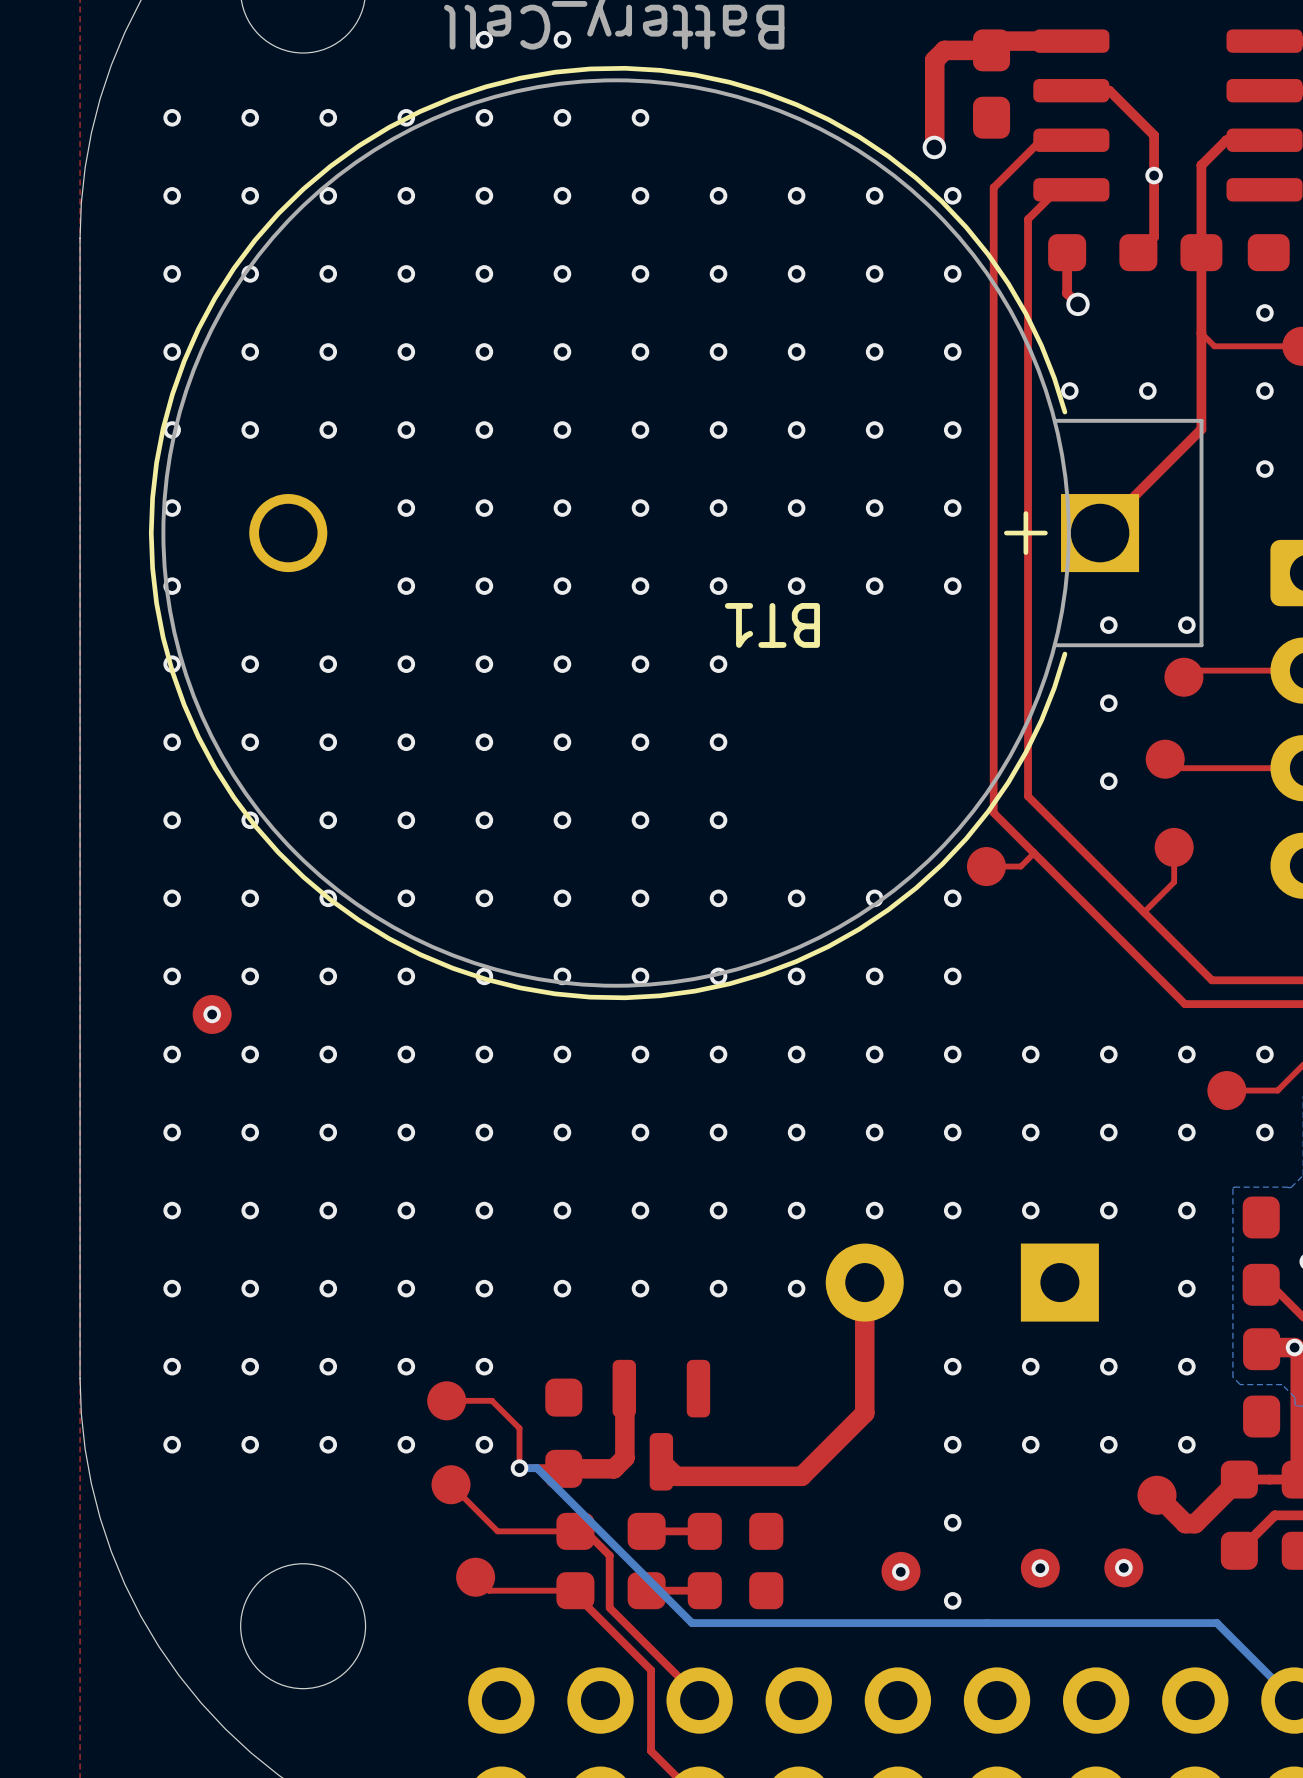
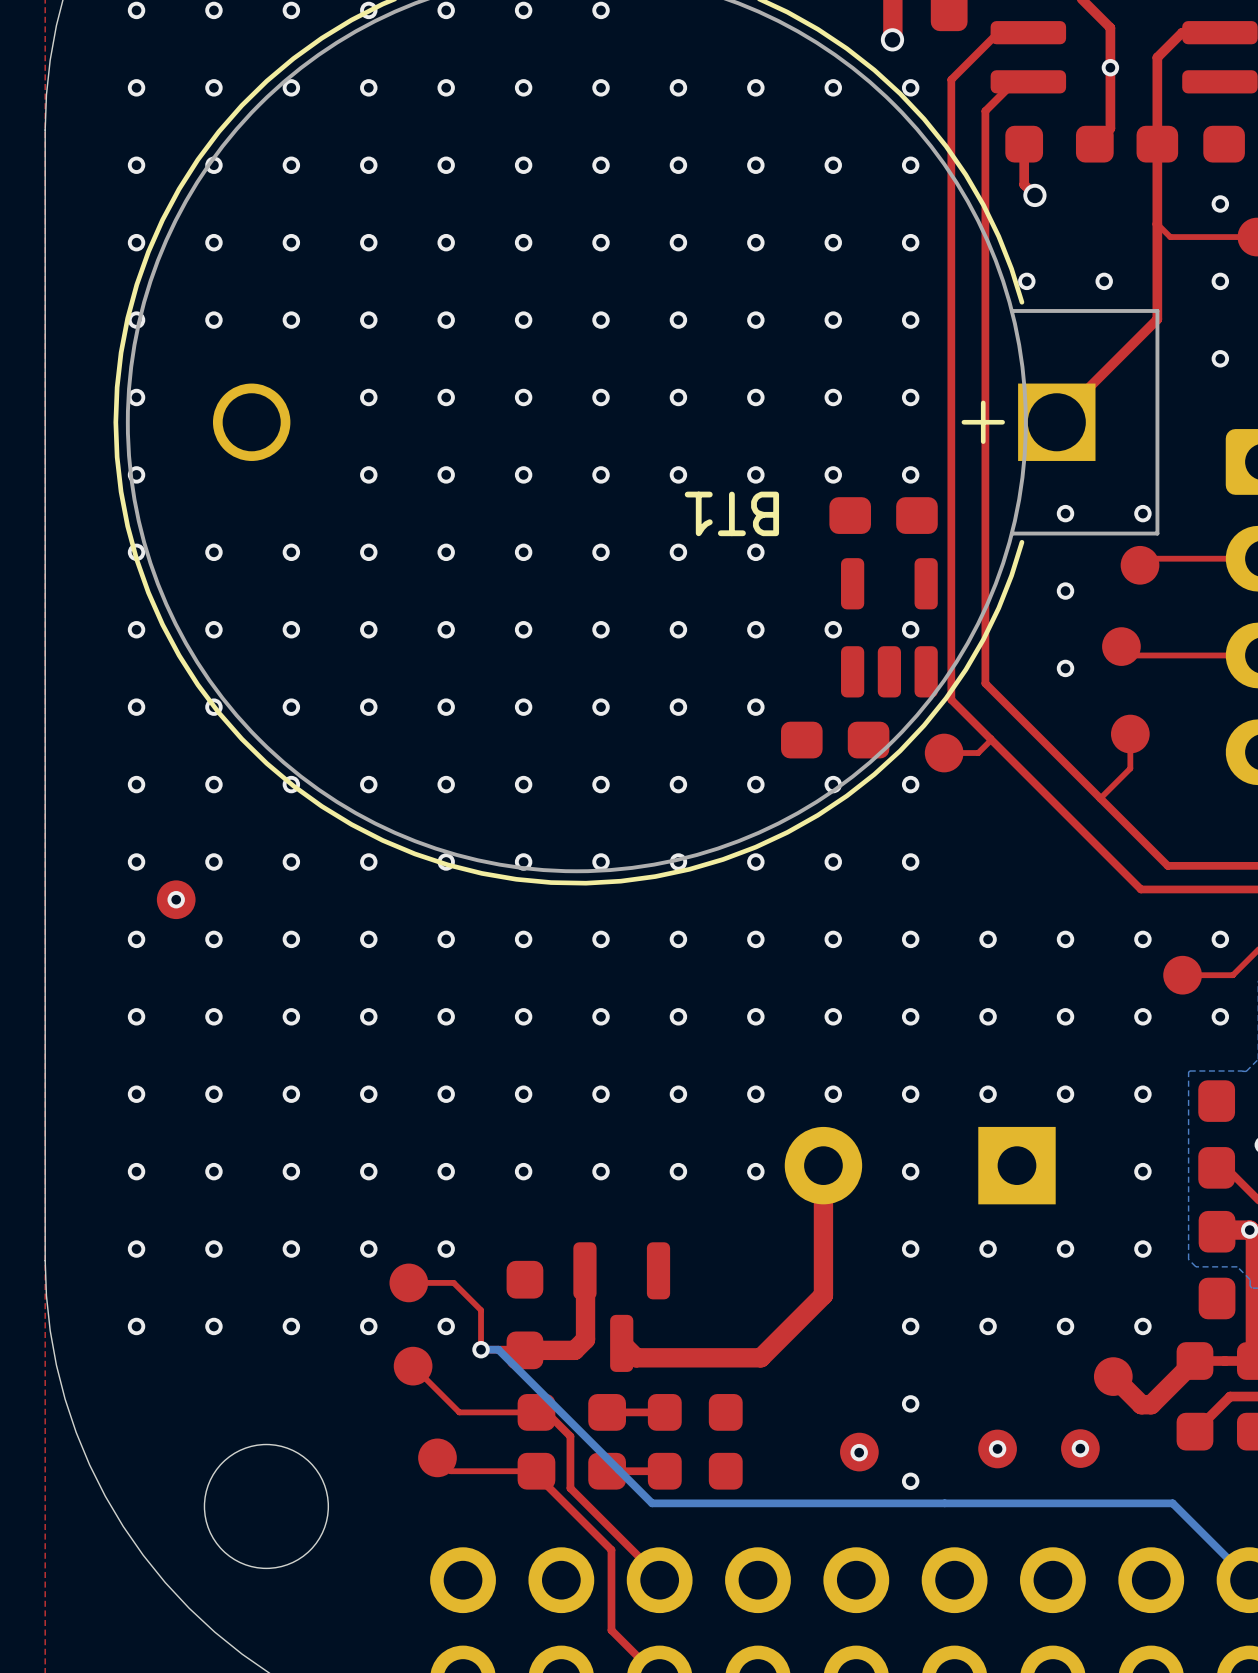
part: none -> (883, 515)
via: none -> (755, 552)
part: none -> (889, 627)
via: none -> (755, 629)
via: none -> (833, 629)
via: none -> (910, 629)
via: none -> (755, 707)
part: none -> (835, 740)

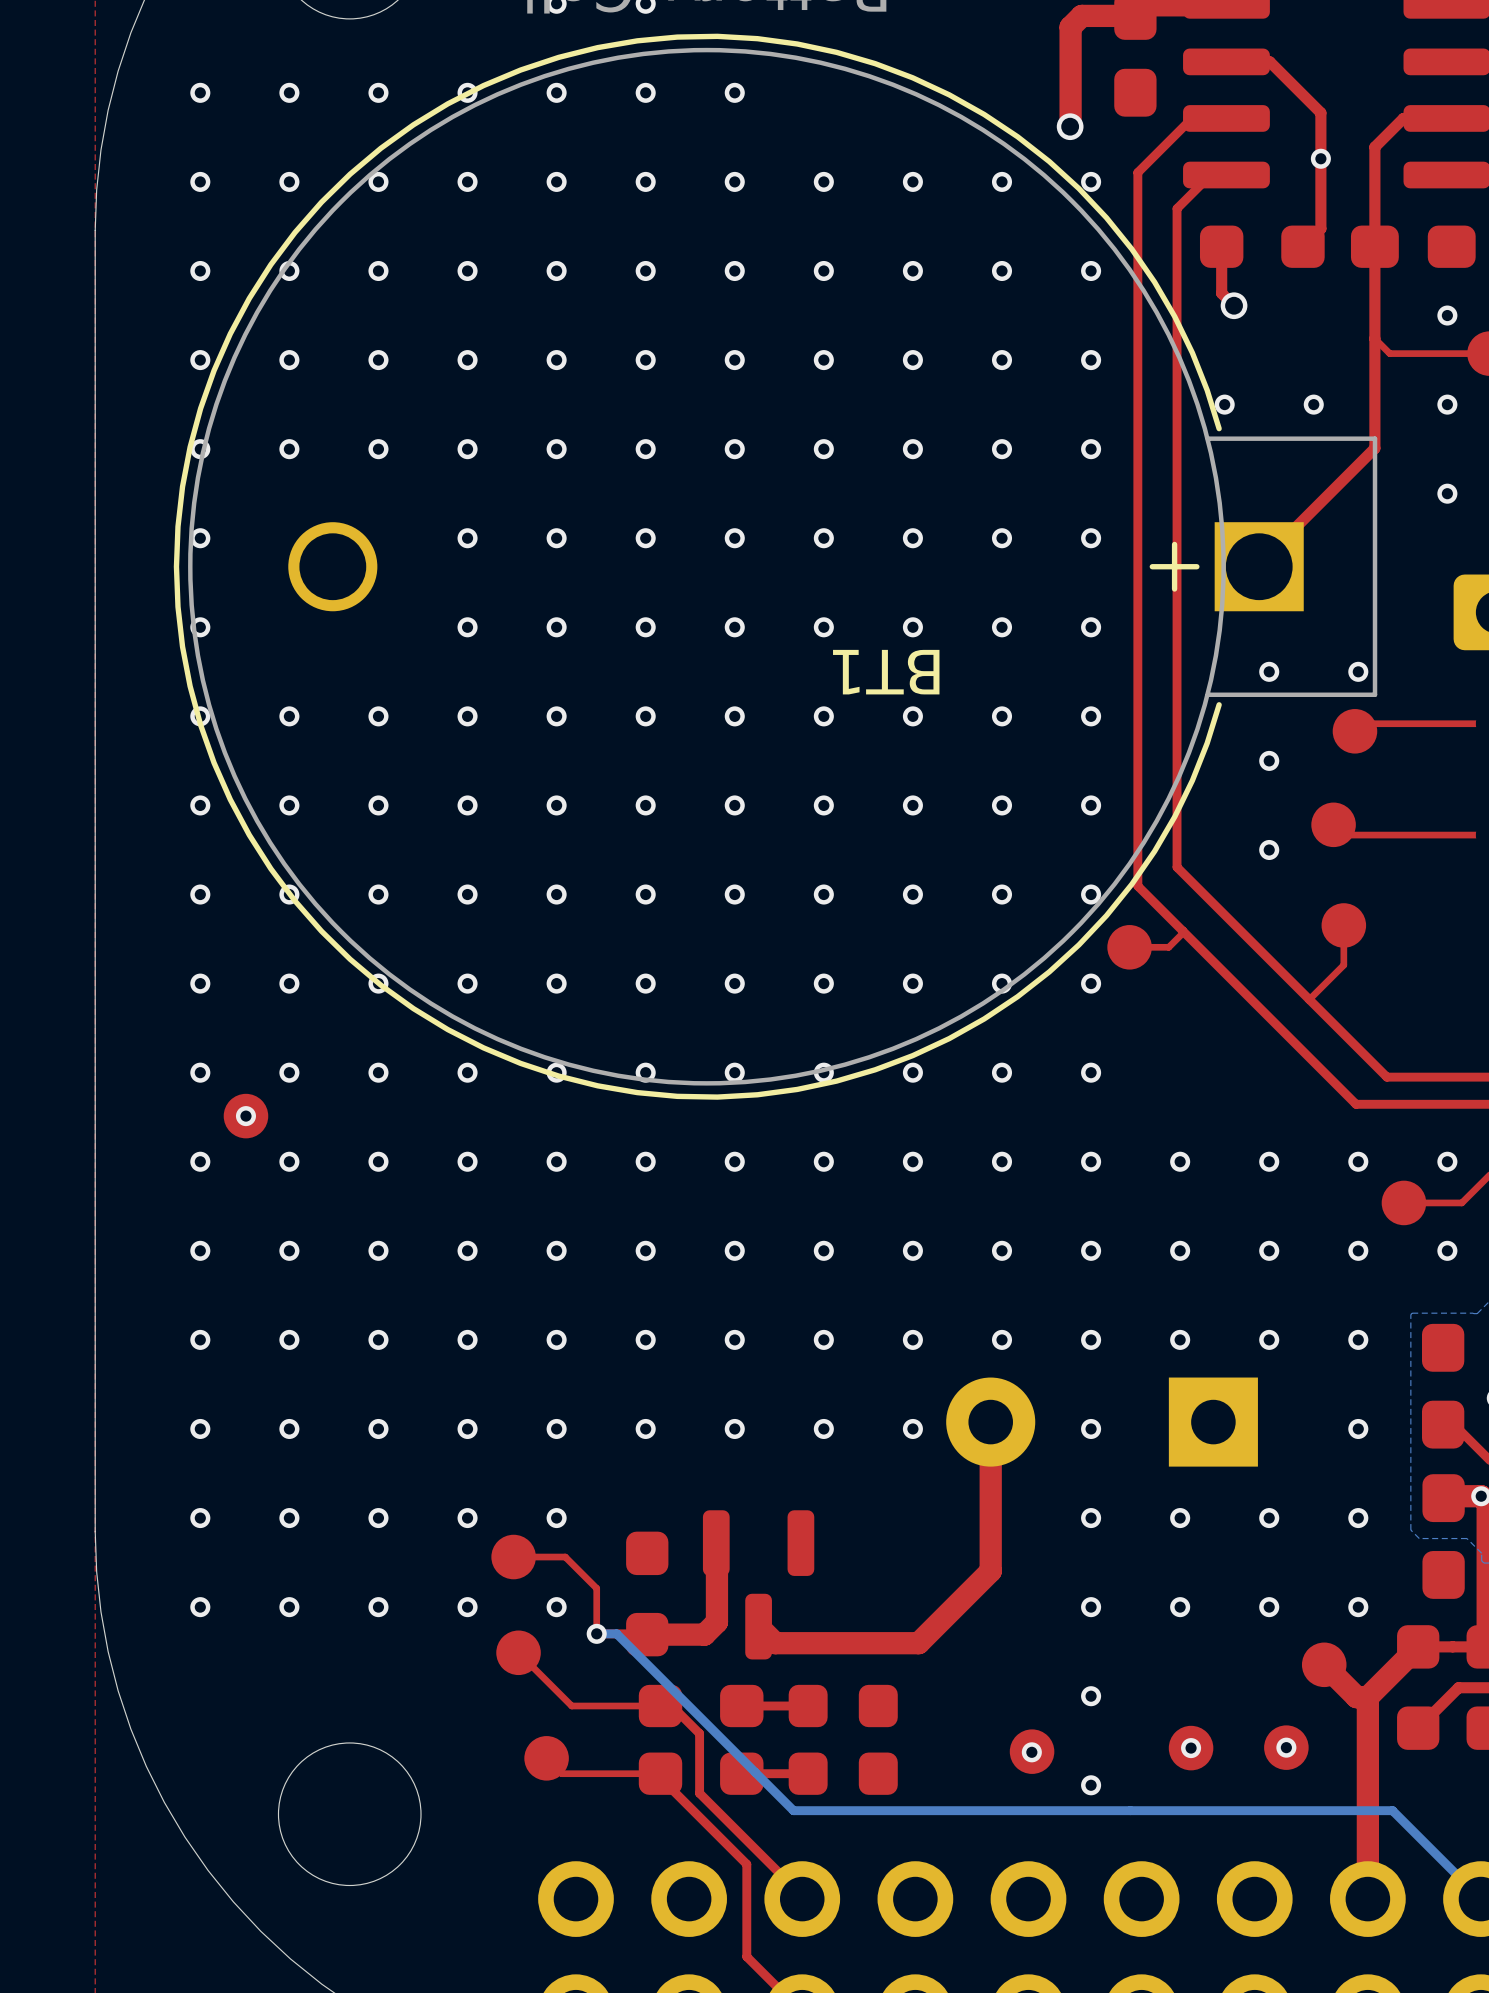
part: (883, 515) -> none
via: none -> (1002, 716)
via: none -> (1091, 716)
part: (889, 627) -> none
via: none -> (1002, 894)
via: none -> (1091, 894)
part: (835, 740) -> none
top track: none -> (1367, 1697) (1367, 1899)

